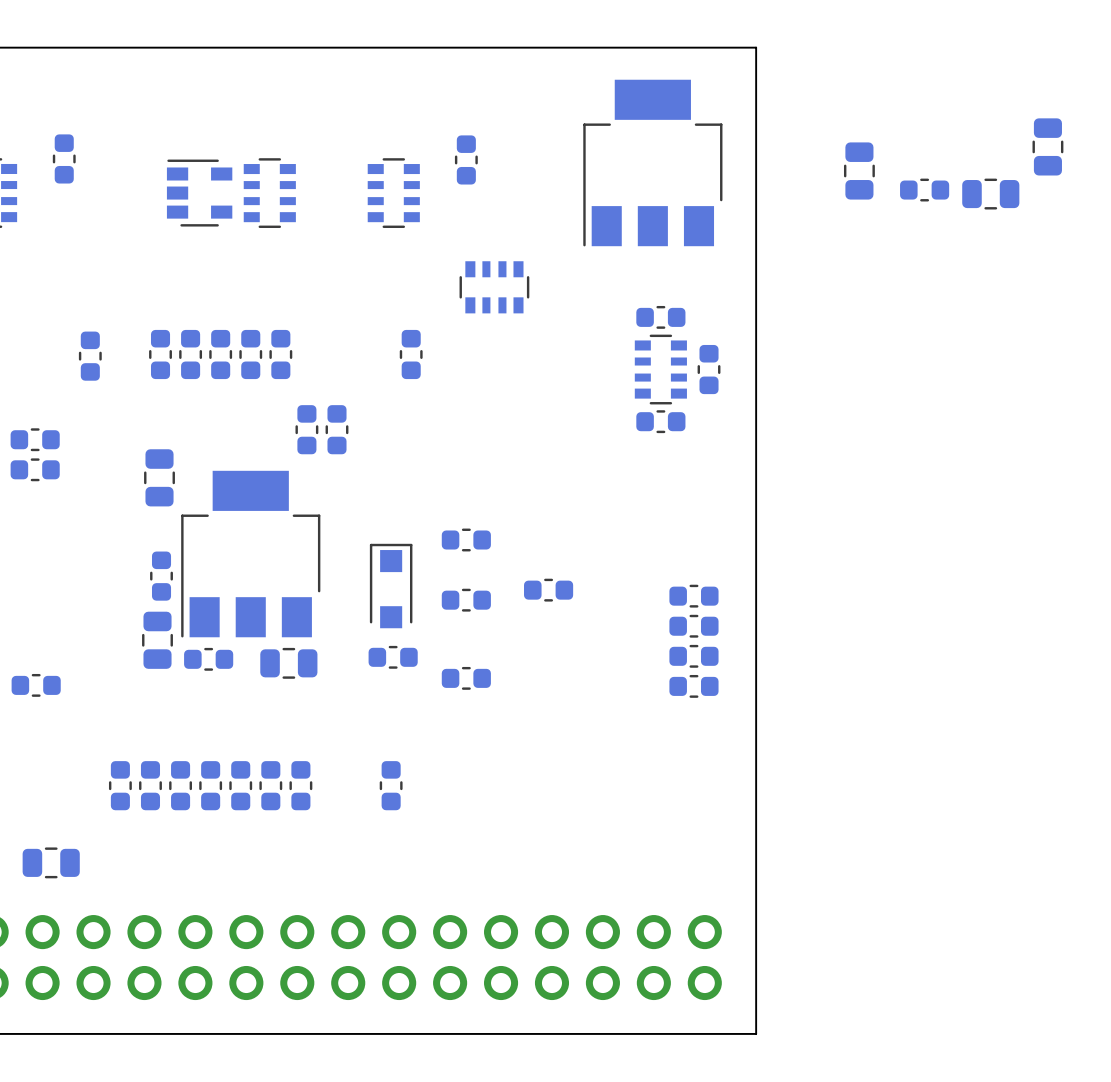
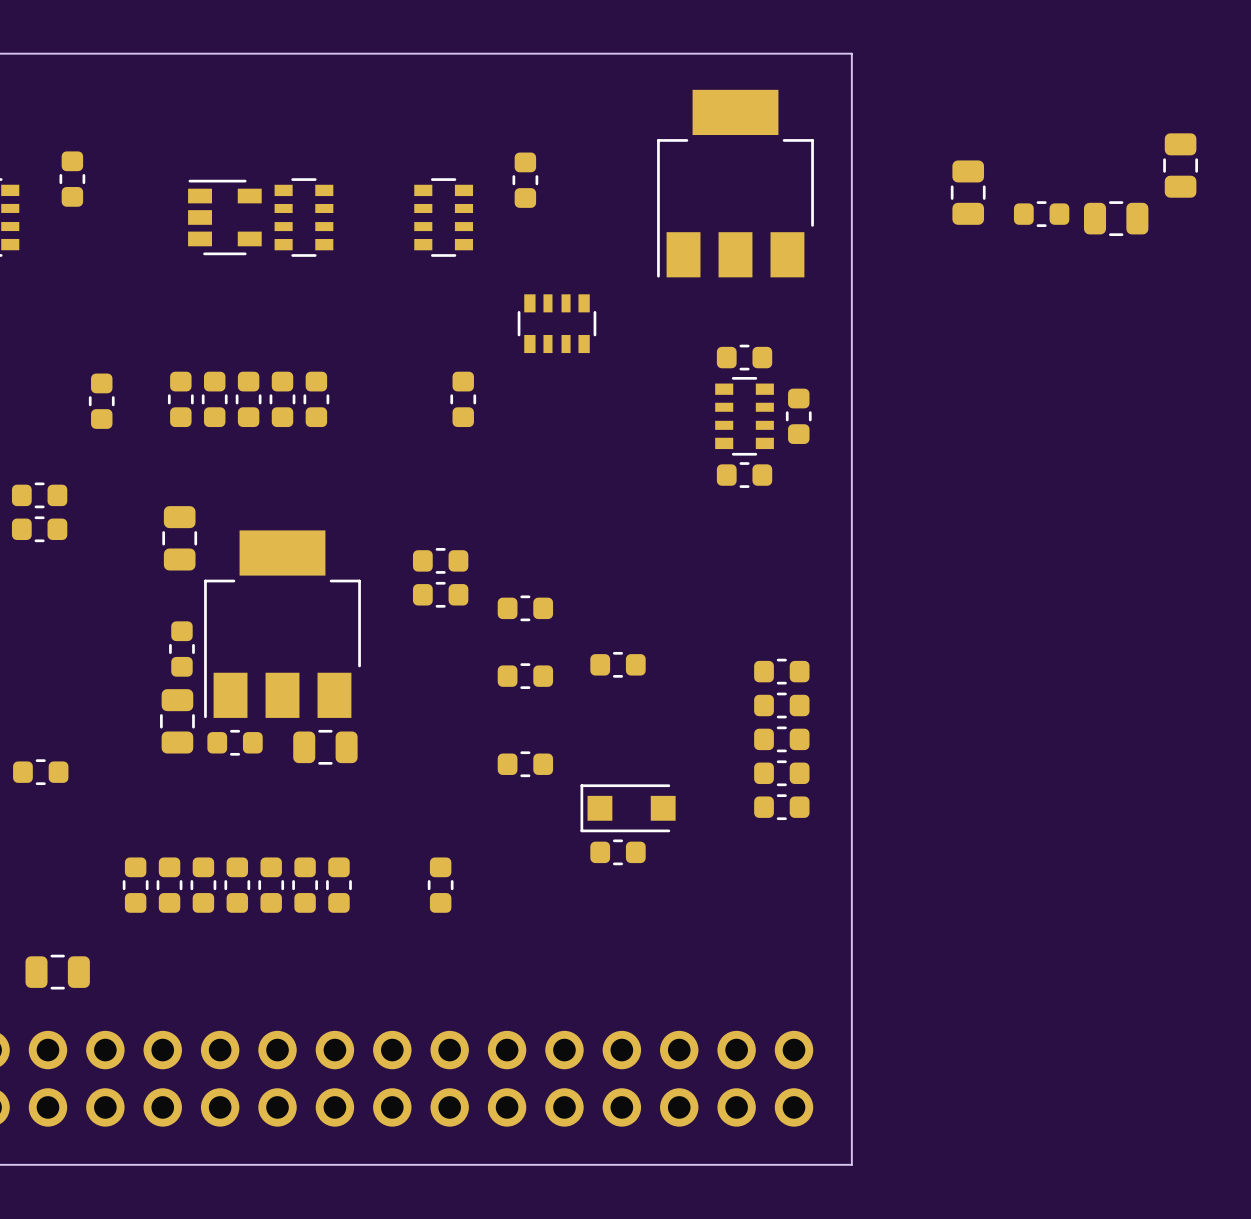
part: (306, 429) -> none
part: (336, 429) -> none
part: none -> (440, 560)
part: none -> (440, 594)
part rotation: 0° (391, 586) -> 90° counterclockwise (628, 808)
part position: (391, 586) -> (628, 808)
part: (393, 657) -> none
part: none -> (781, 807)
part: none -> (618, 852)

